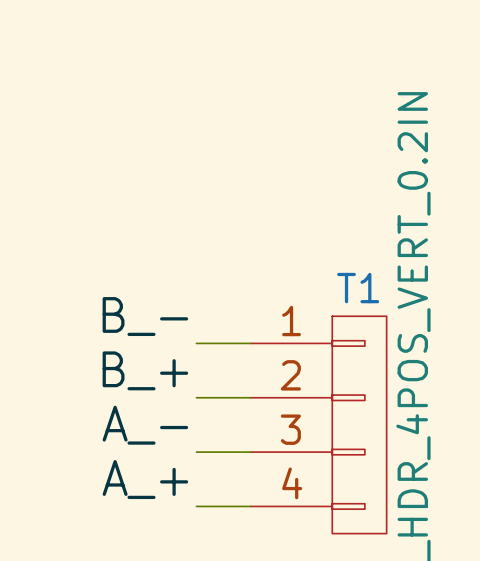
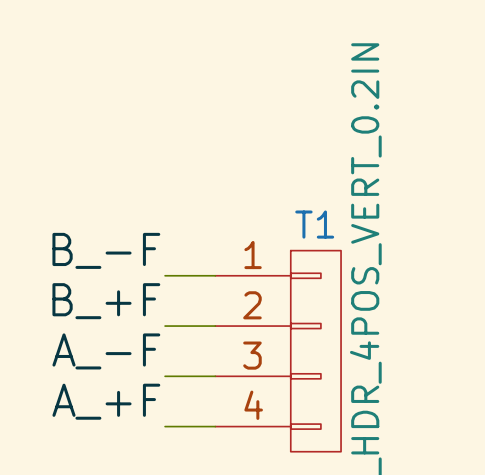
label: B_- (145, 316) -> B_-F (106, 250)
label: B_+ (145, 370) -> B_+F (106, 301)
label: A_- (145, 425) -> A_-F (106, 351)
label: A_+ (145, 479) -> A_+F (106, 401)

